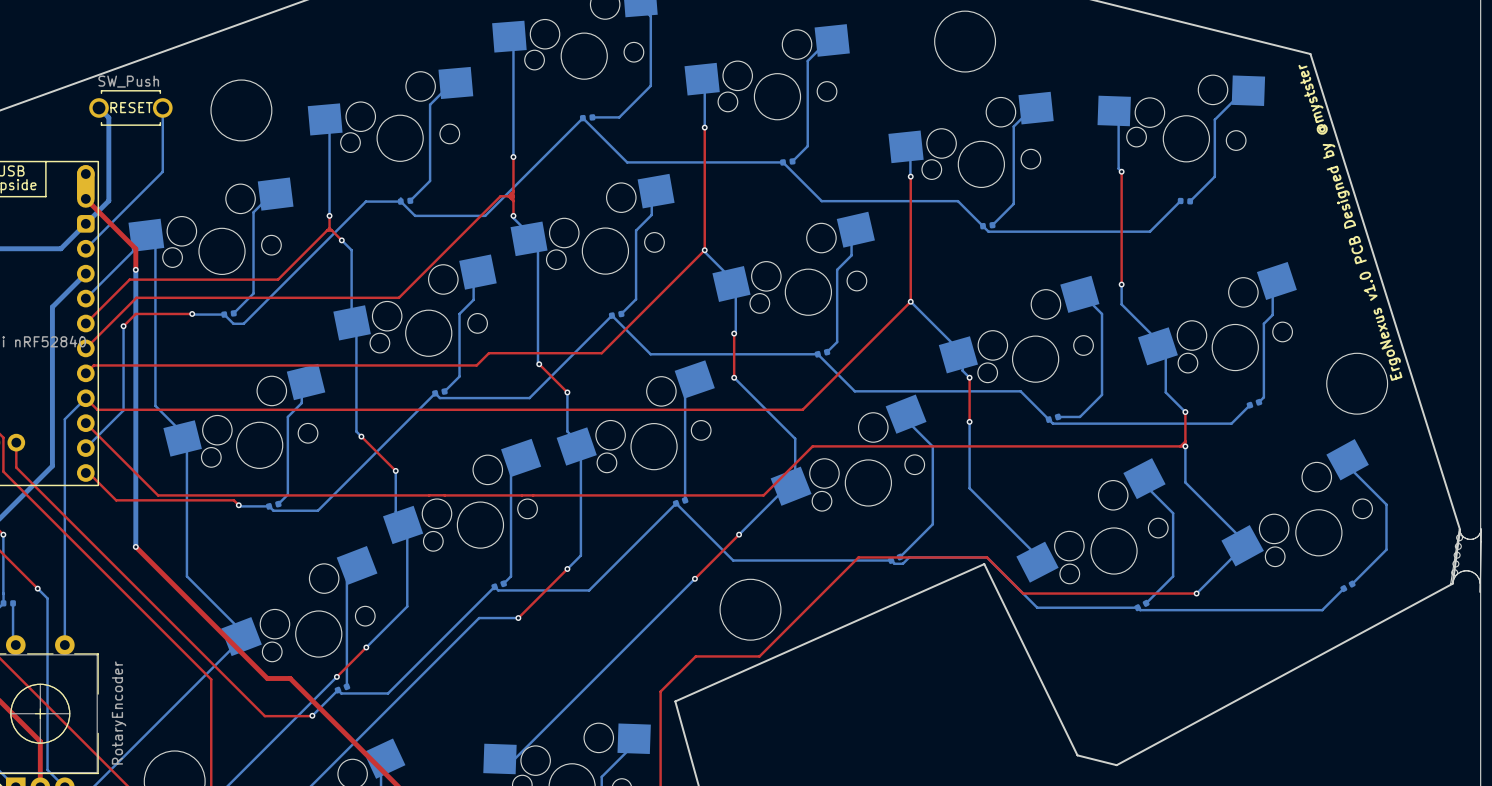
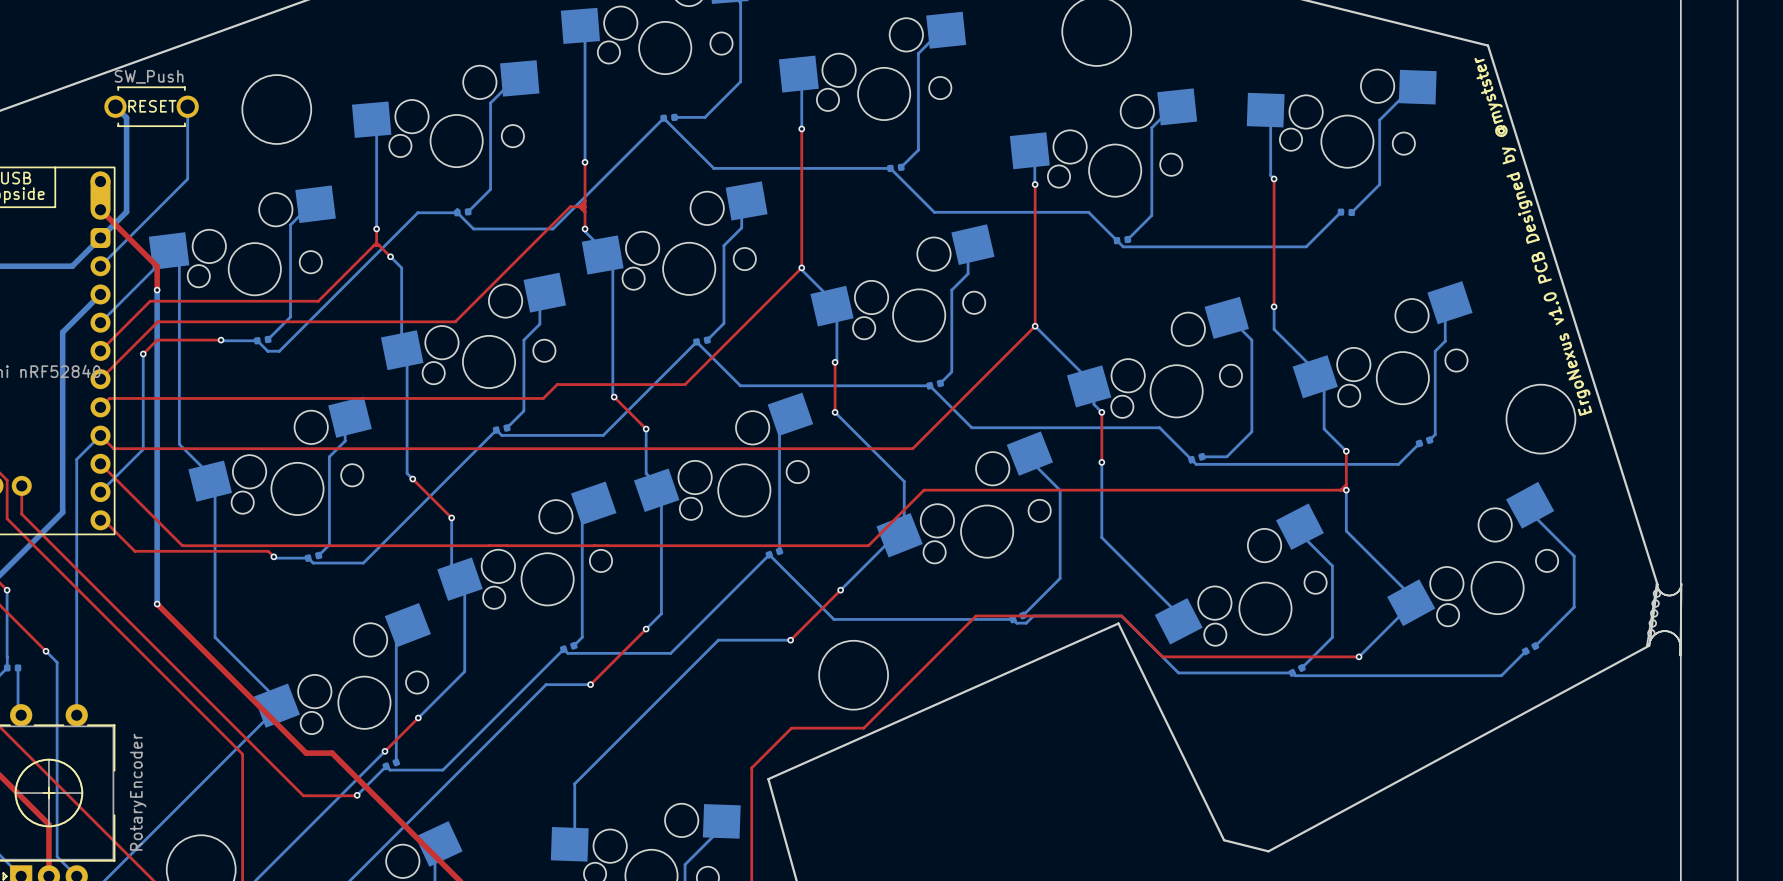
bottom track: (694, 578) (504, 769) -> (790, 640) (718, 640) (574, 783) (574, 856)

